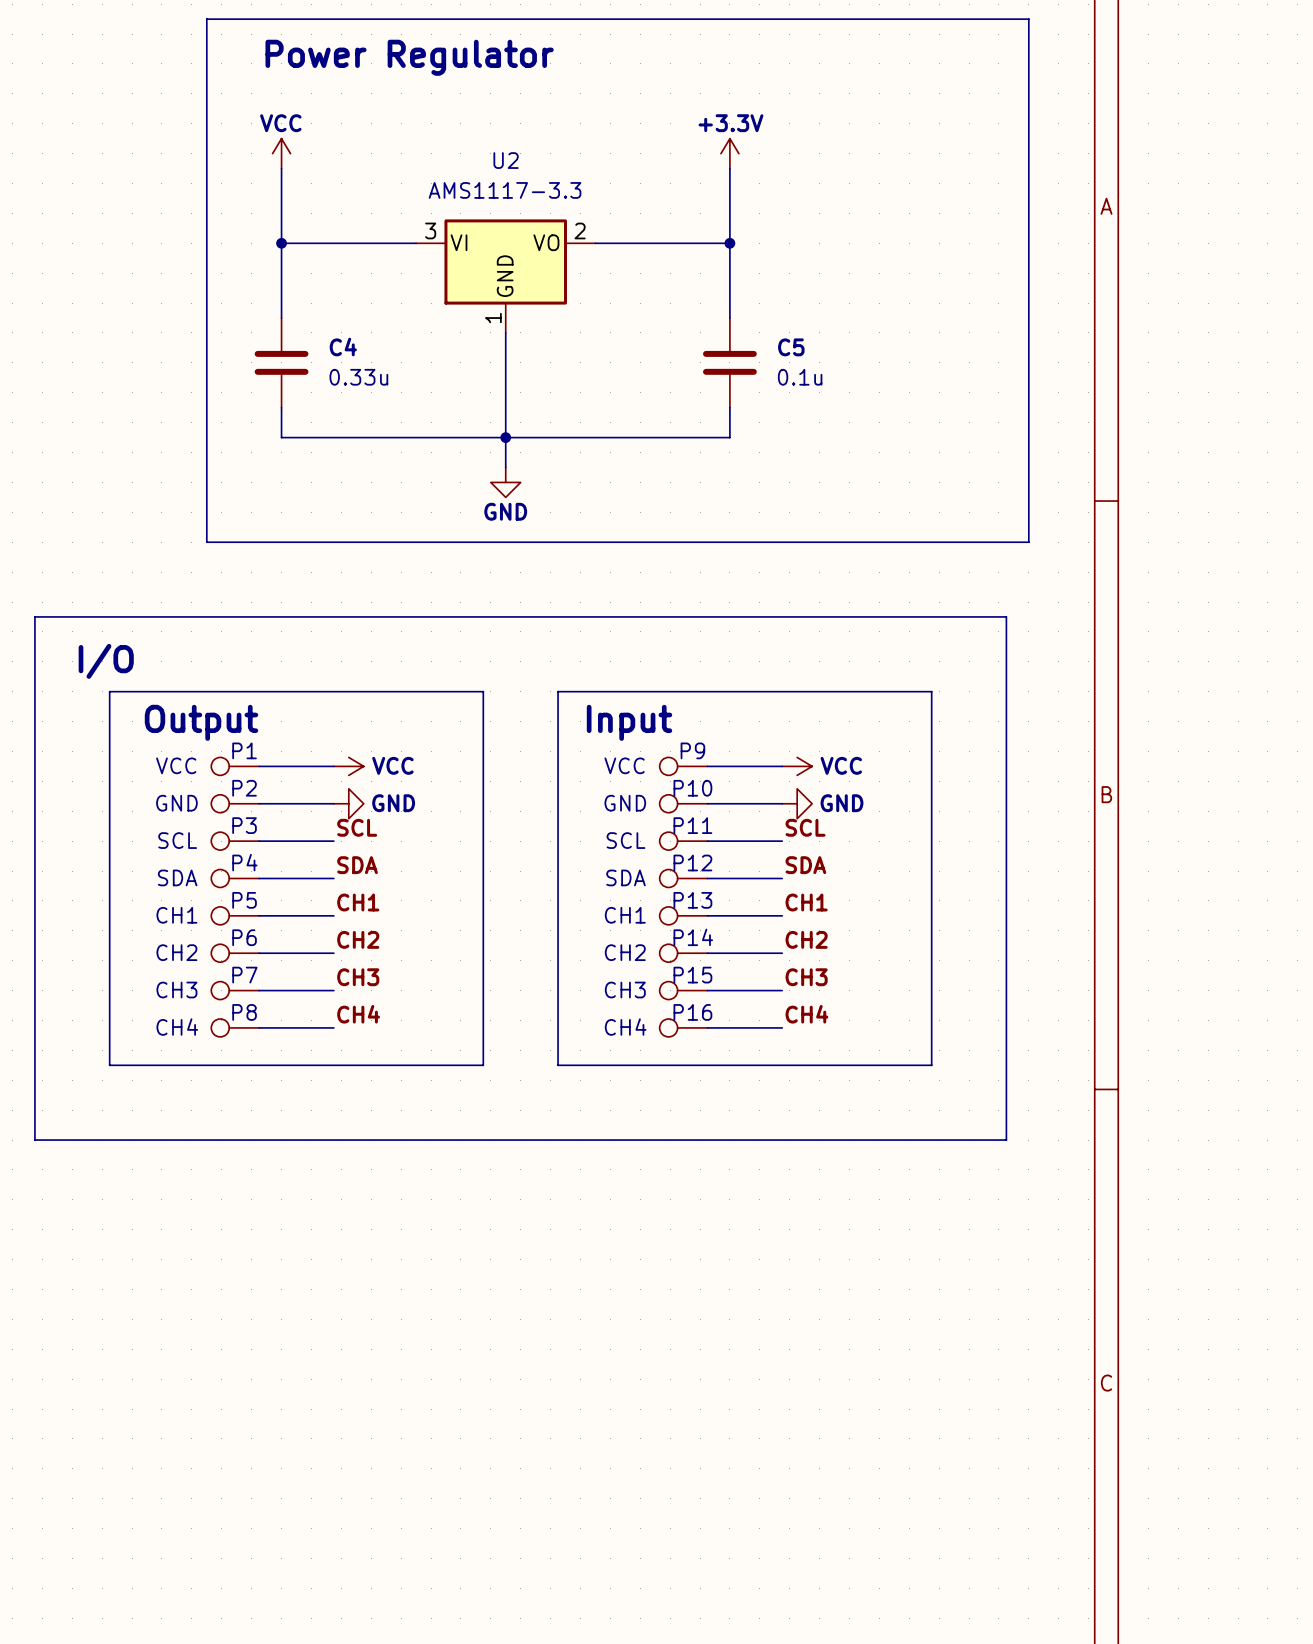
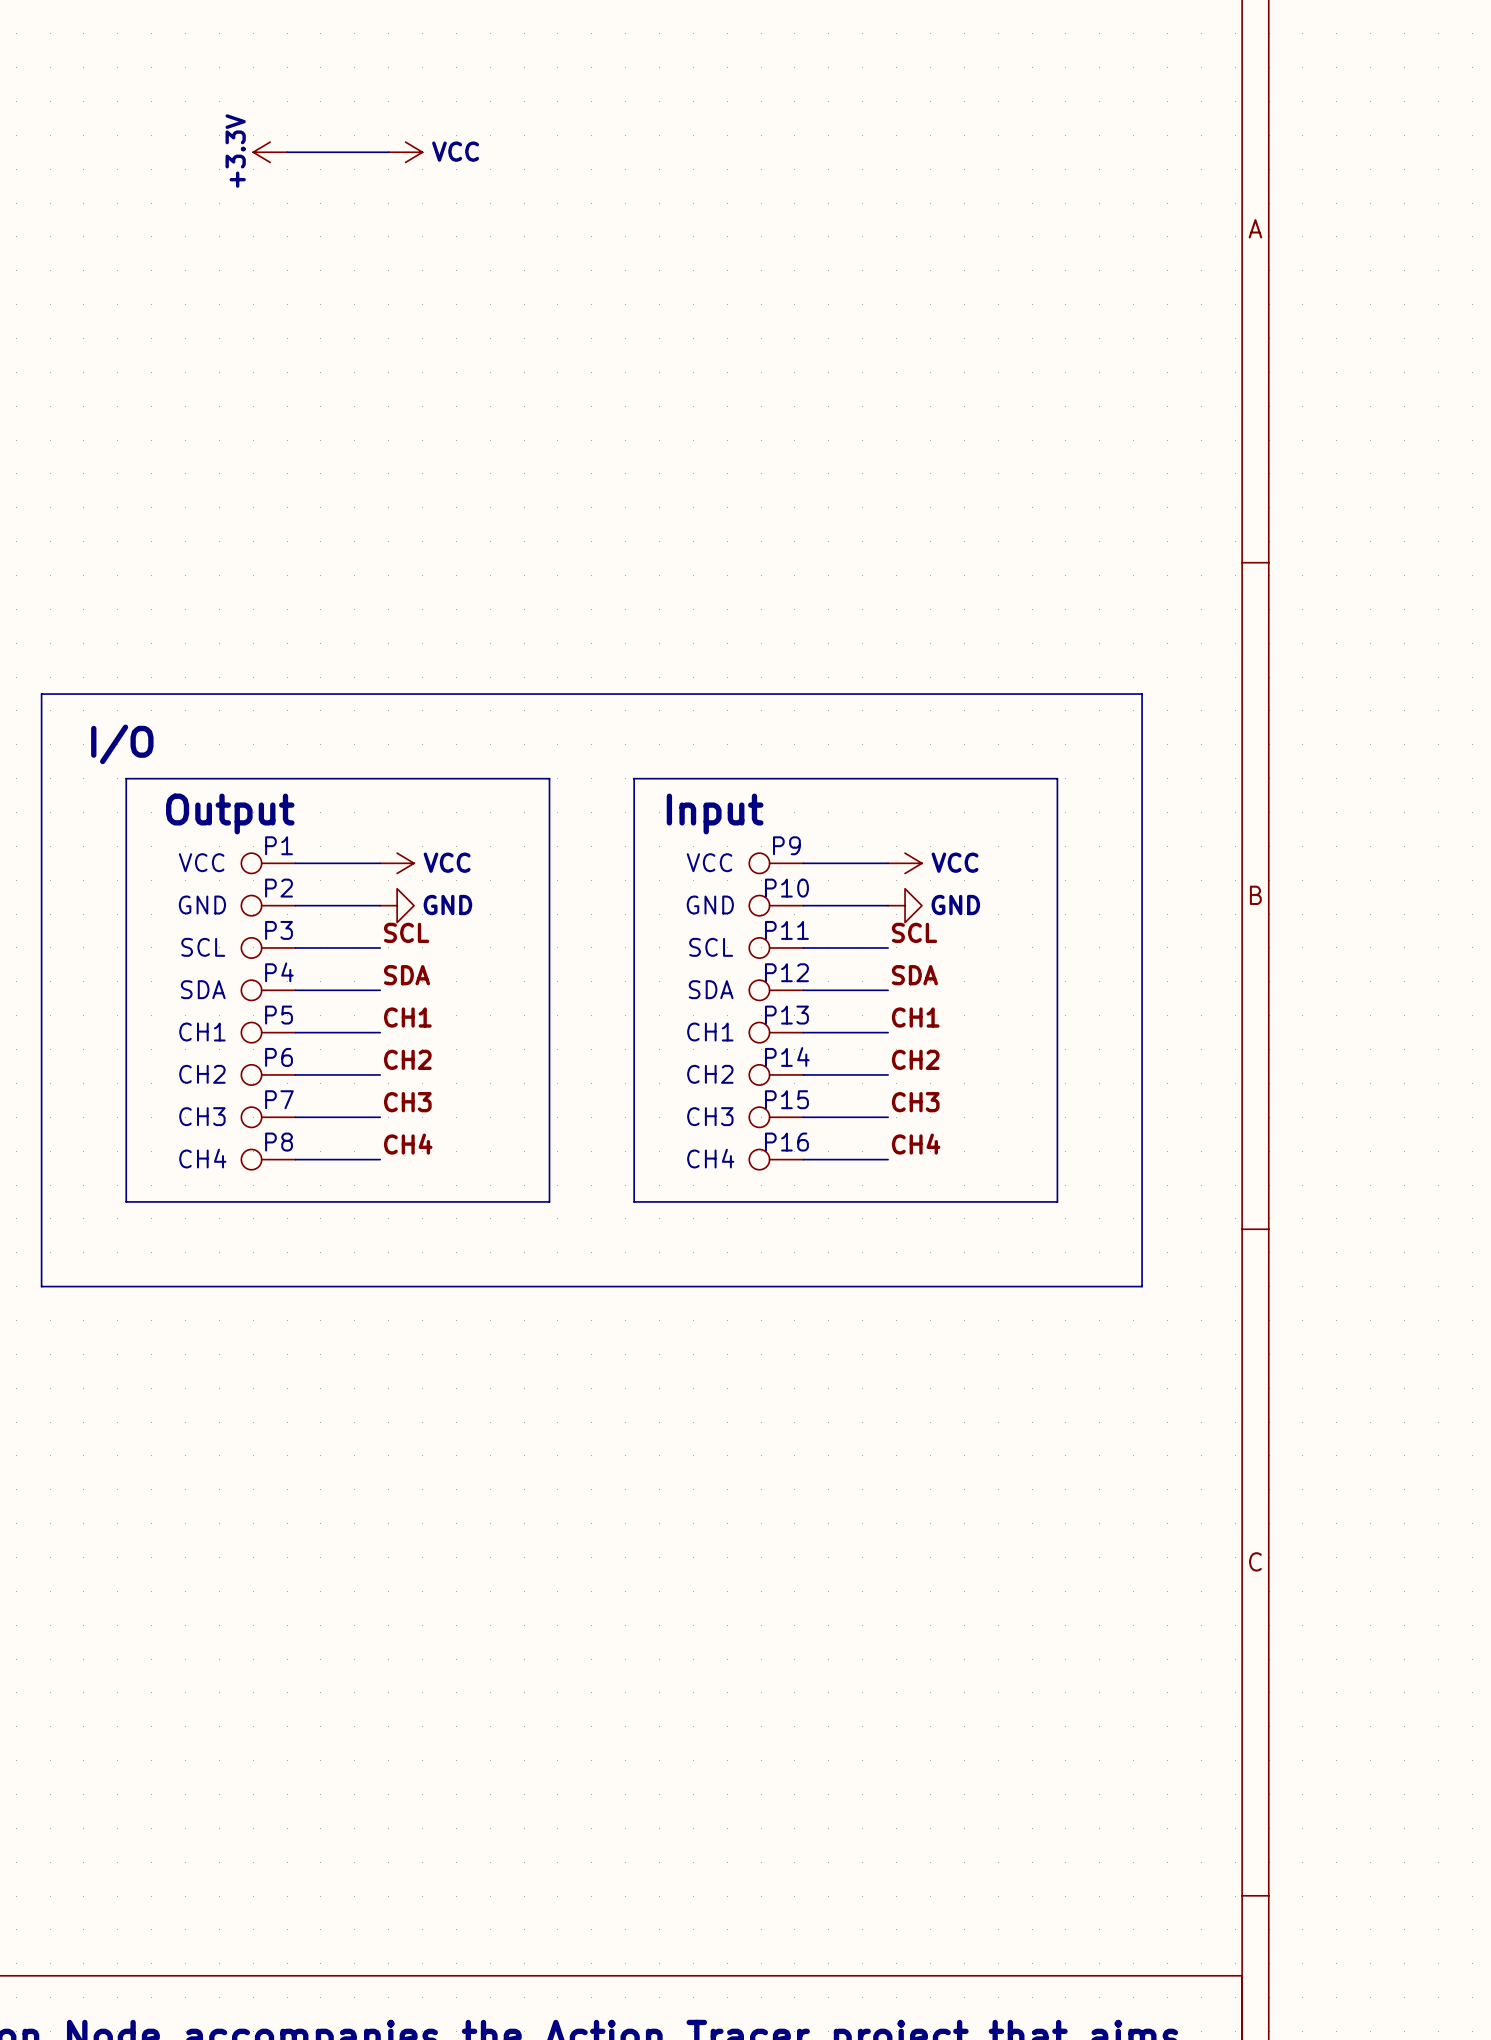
line: (206, 19) (206, 542) (1028, 542) (1028, 19) (206, 19) -> none
text: Power Regulator (409, 57) -> none
power symbol: none -> +3.3V (270, 152)
wire: none -> (287, 152) (388, 152)
power symbol rotation: 0° (281, 153) -> 90° clockwise (405, 152)
power symbol position: VCC (281, 153) -> VCC (405, 152)
power symbol: +3.3V (729, 153) -> none
wire: (281, 168) (281, 318) -> none
wire: (729, 168) (729, 318) -> none
wire: (281, 243) (416, 243) -> none
junction: (281, 243) -> none
wire: (595, 243) (729, 243) -> none
junction: (729, 243) -> none
U2: AMS1117-3.3 (505, 276) -> none
wire: (505, 332) (505, 467) -> none
C4: 0.33u (281, 362) -> none
C5: 0.1u (729, 362) -> none
wire: (281, 407) (281, 437) (729, 437) (729, 407) -> none
junction: (505, 437) -> none
power symbol: GND (505, 482) -> none

